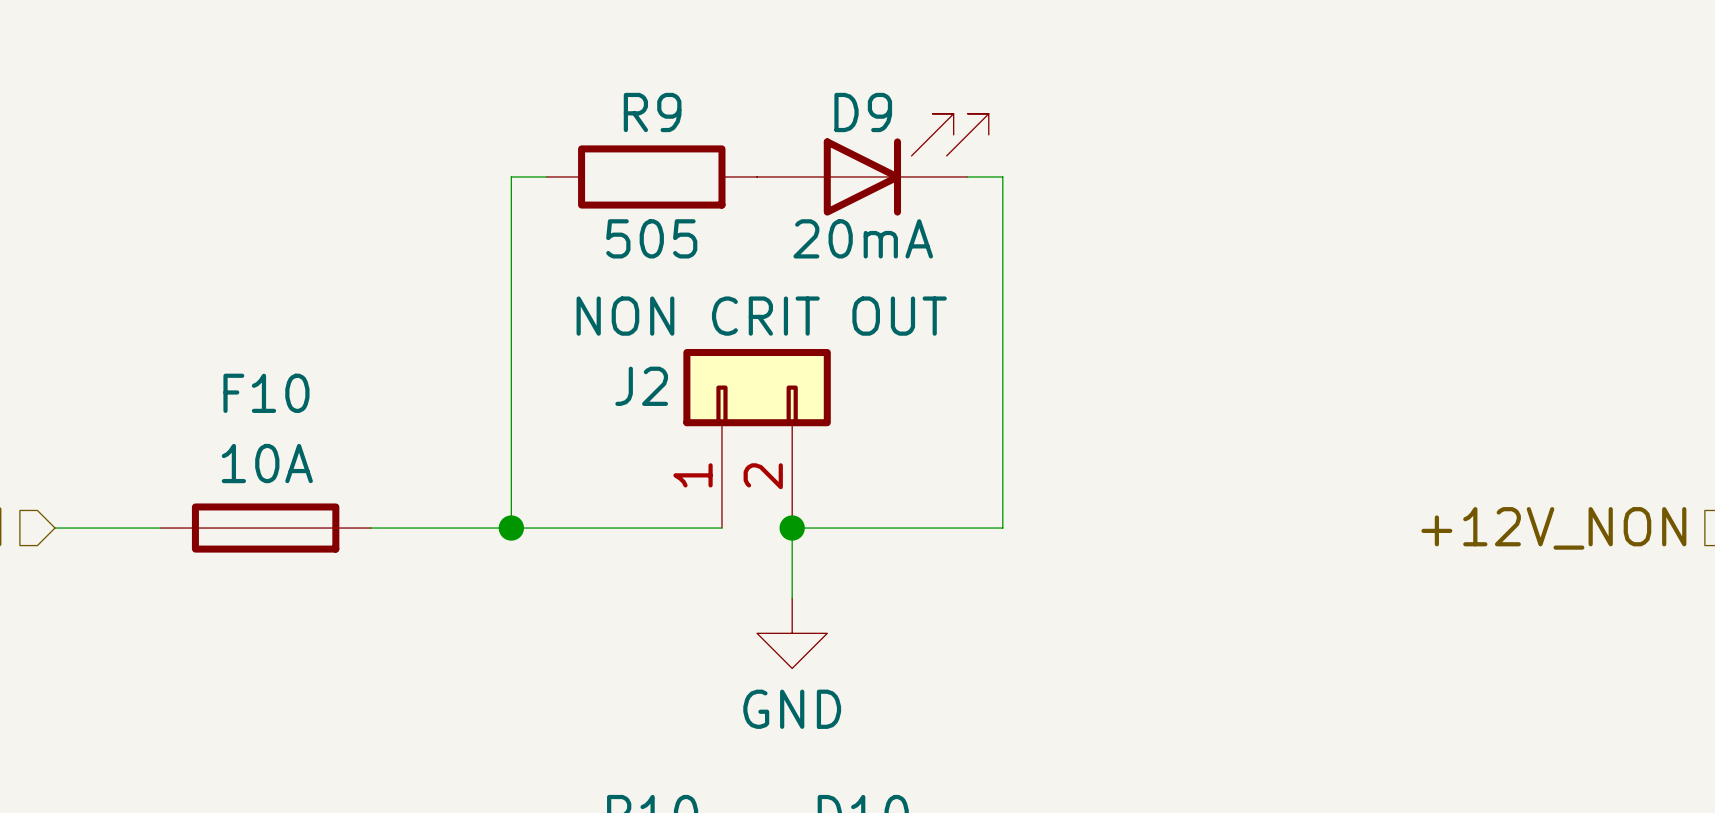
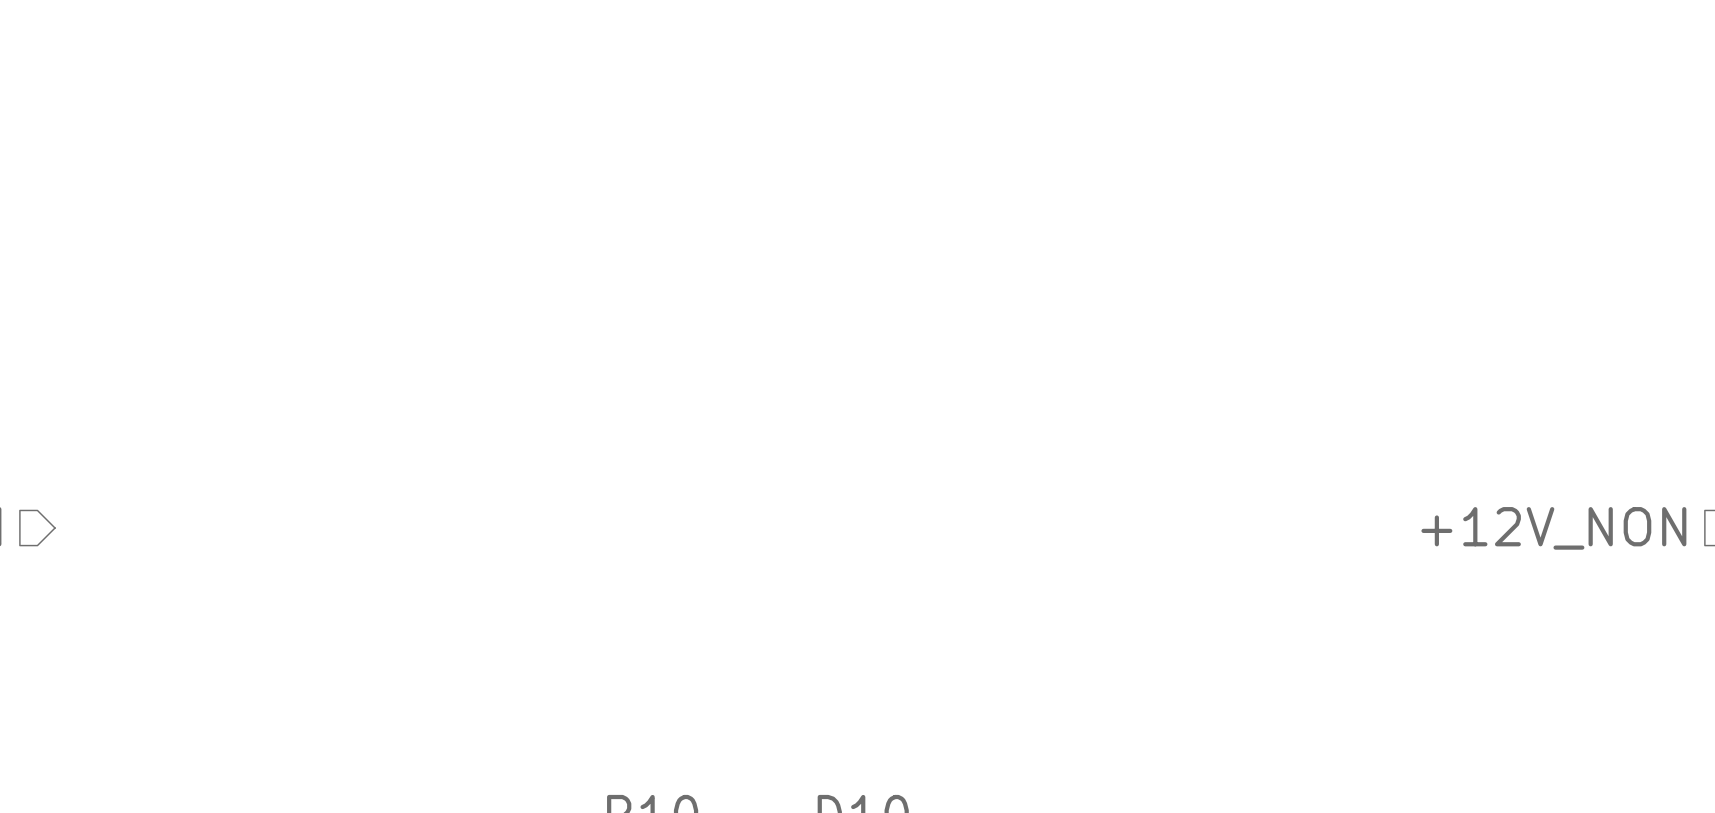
D9: 20mA (872, 164) -> none
wire: (546, 176) (511, 176) (511, 528) -> none
R9: 505 (651, 176) -> none
wire: (967, 176) (1002, 176) (1002, 528) (792, 528) (792, 598) -> none
J2: NON CRIT OUT (757, 438) -> none
wire: (55, 528) (160, 528) -> none
F10: 10A (265, 528) -> none
wire: (370, 528) (721, 528) -> none
junction: (511, 528) -> none
junction: (792, 528) -> none
power symbol: GND (792, 633) -> none

